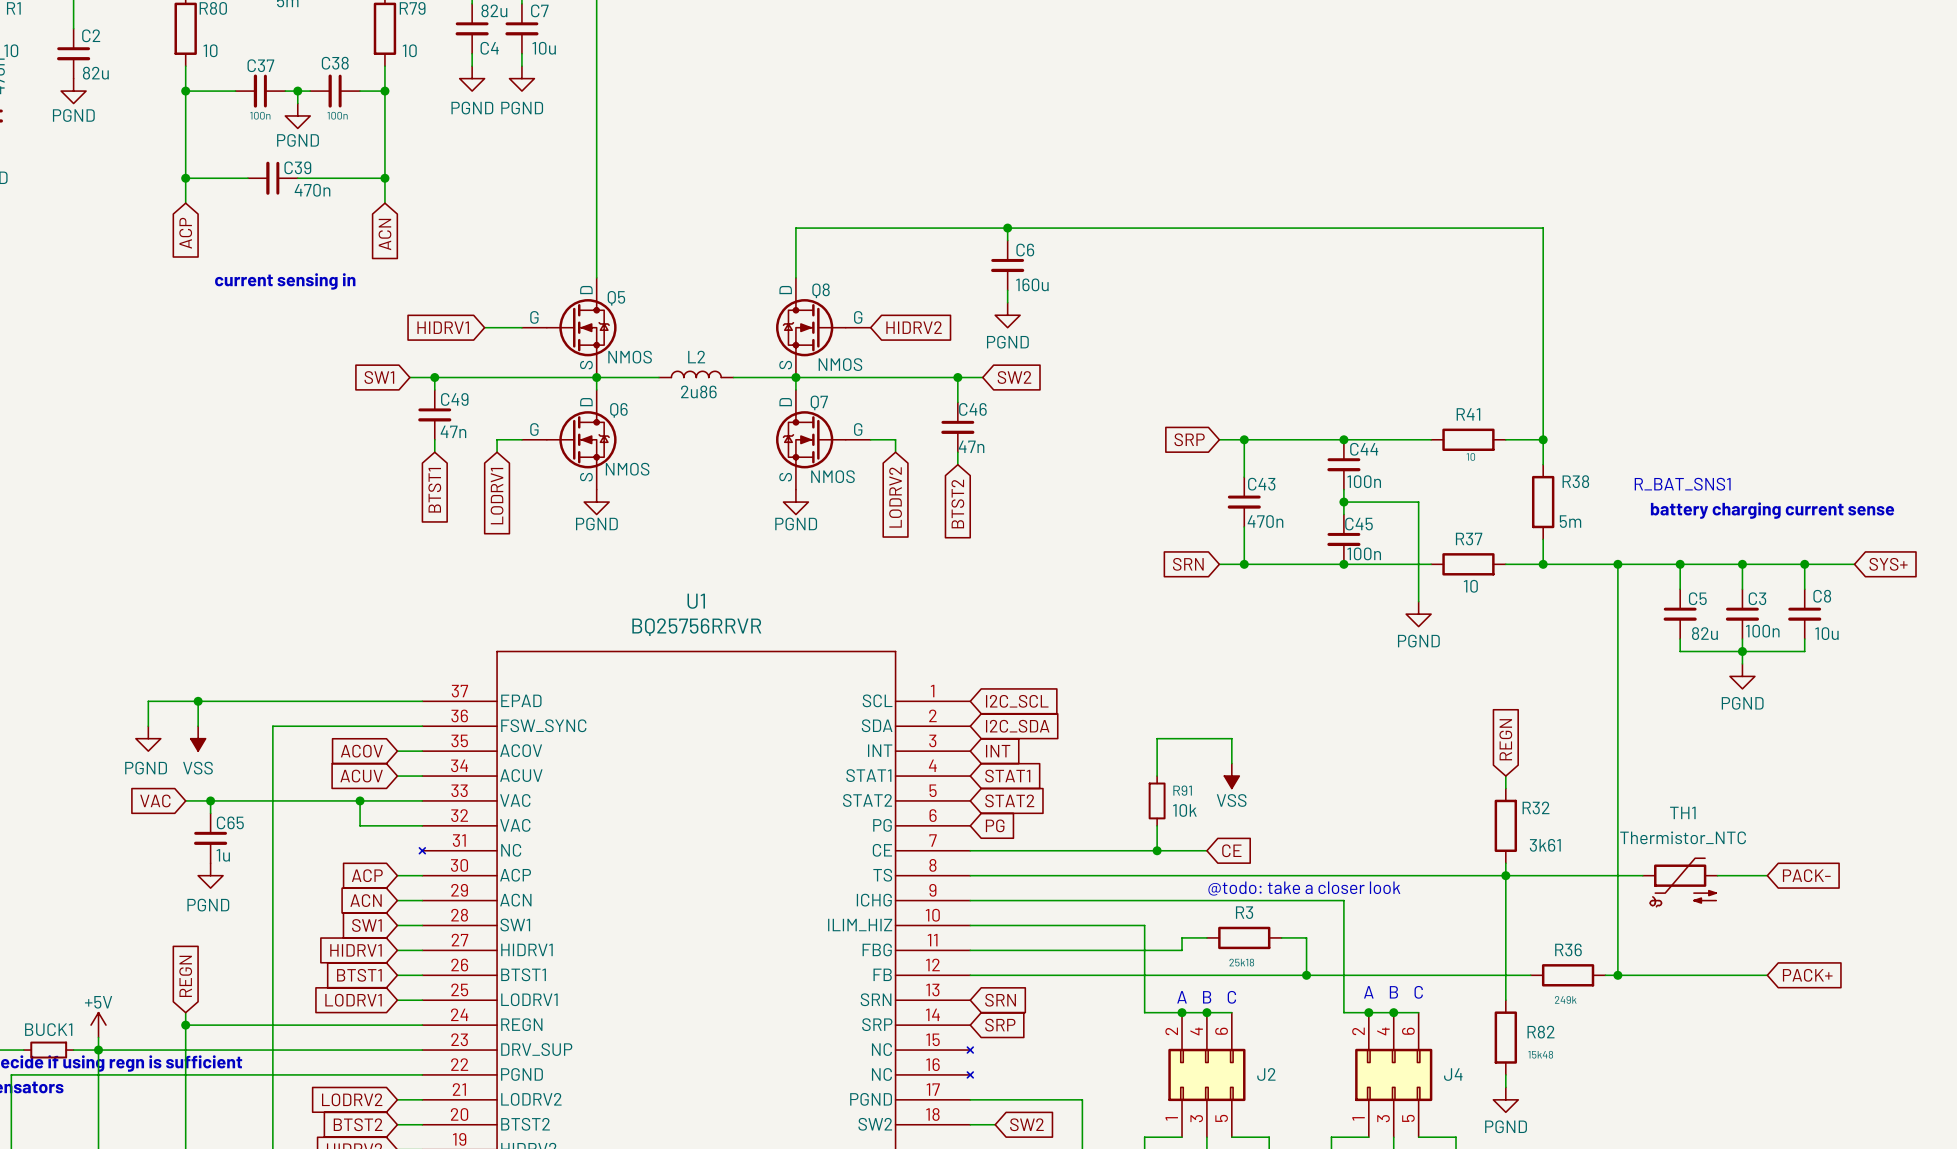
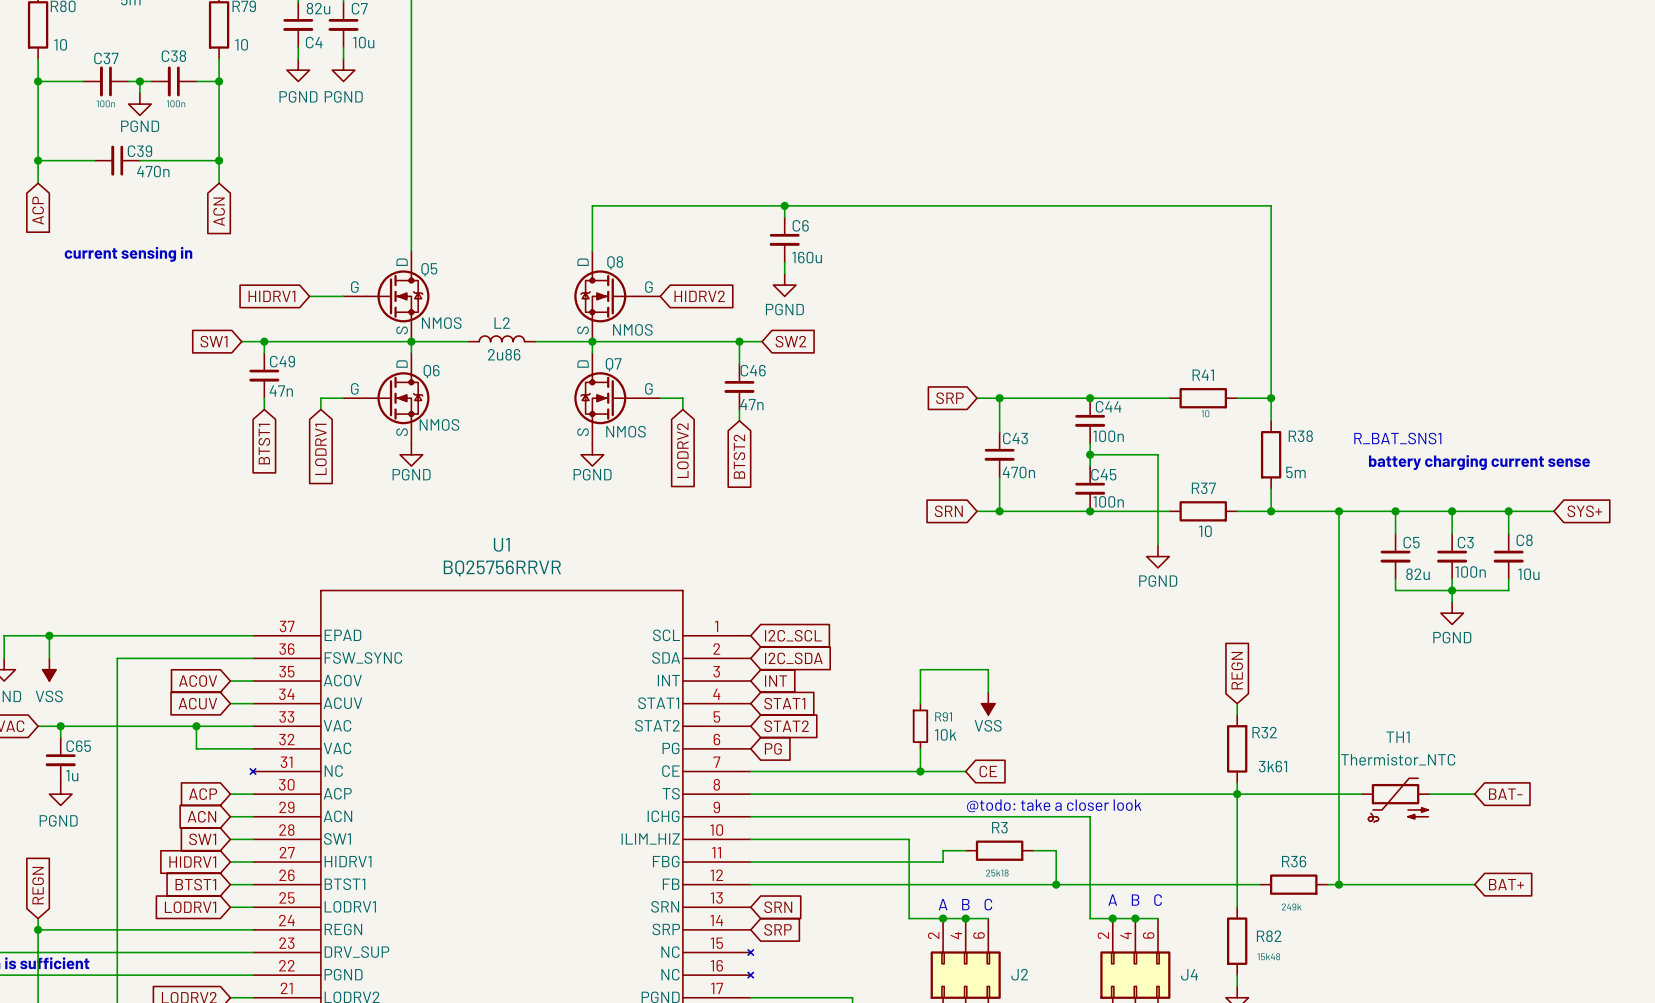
global label: PACK- (1806, 875) -> BAT- (1505, 794)
global label: PACK+ (1807, 975) -> BAT+ (1506, 884)

